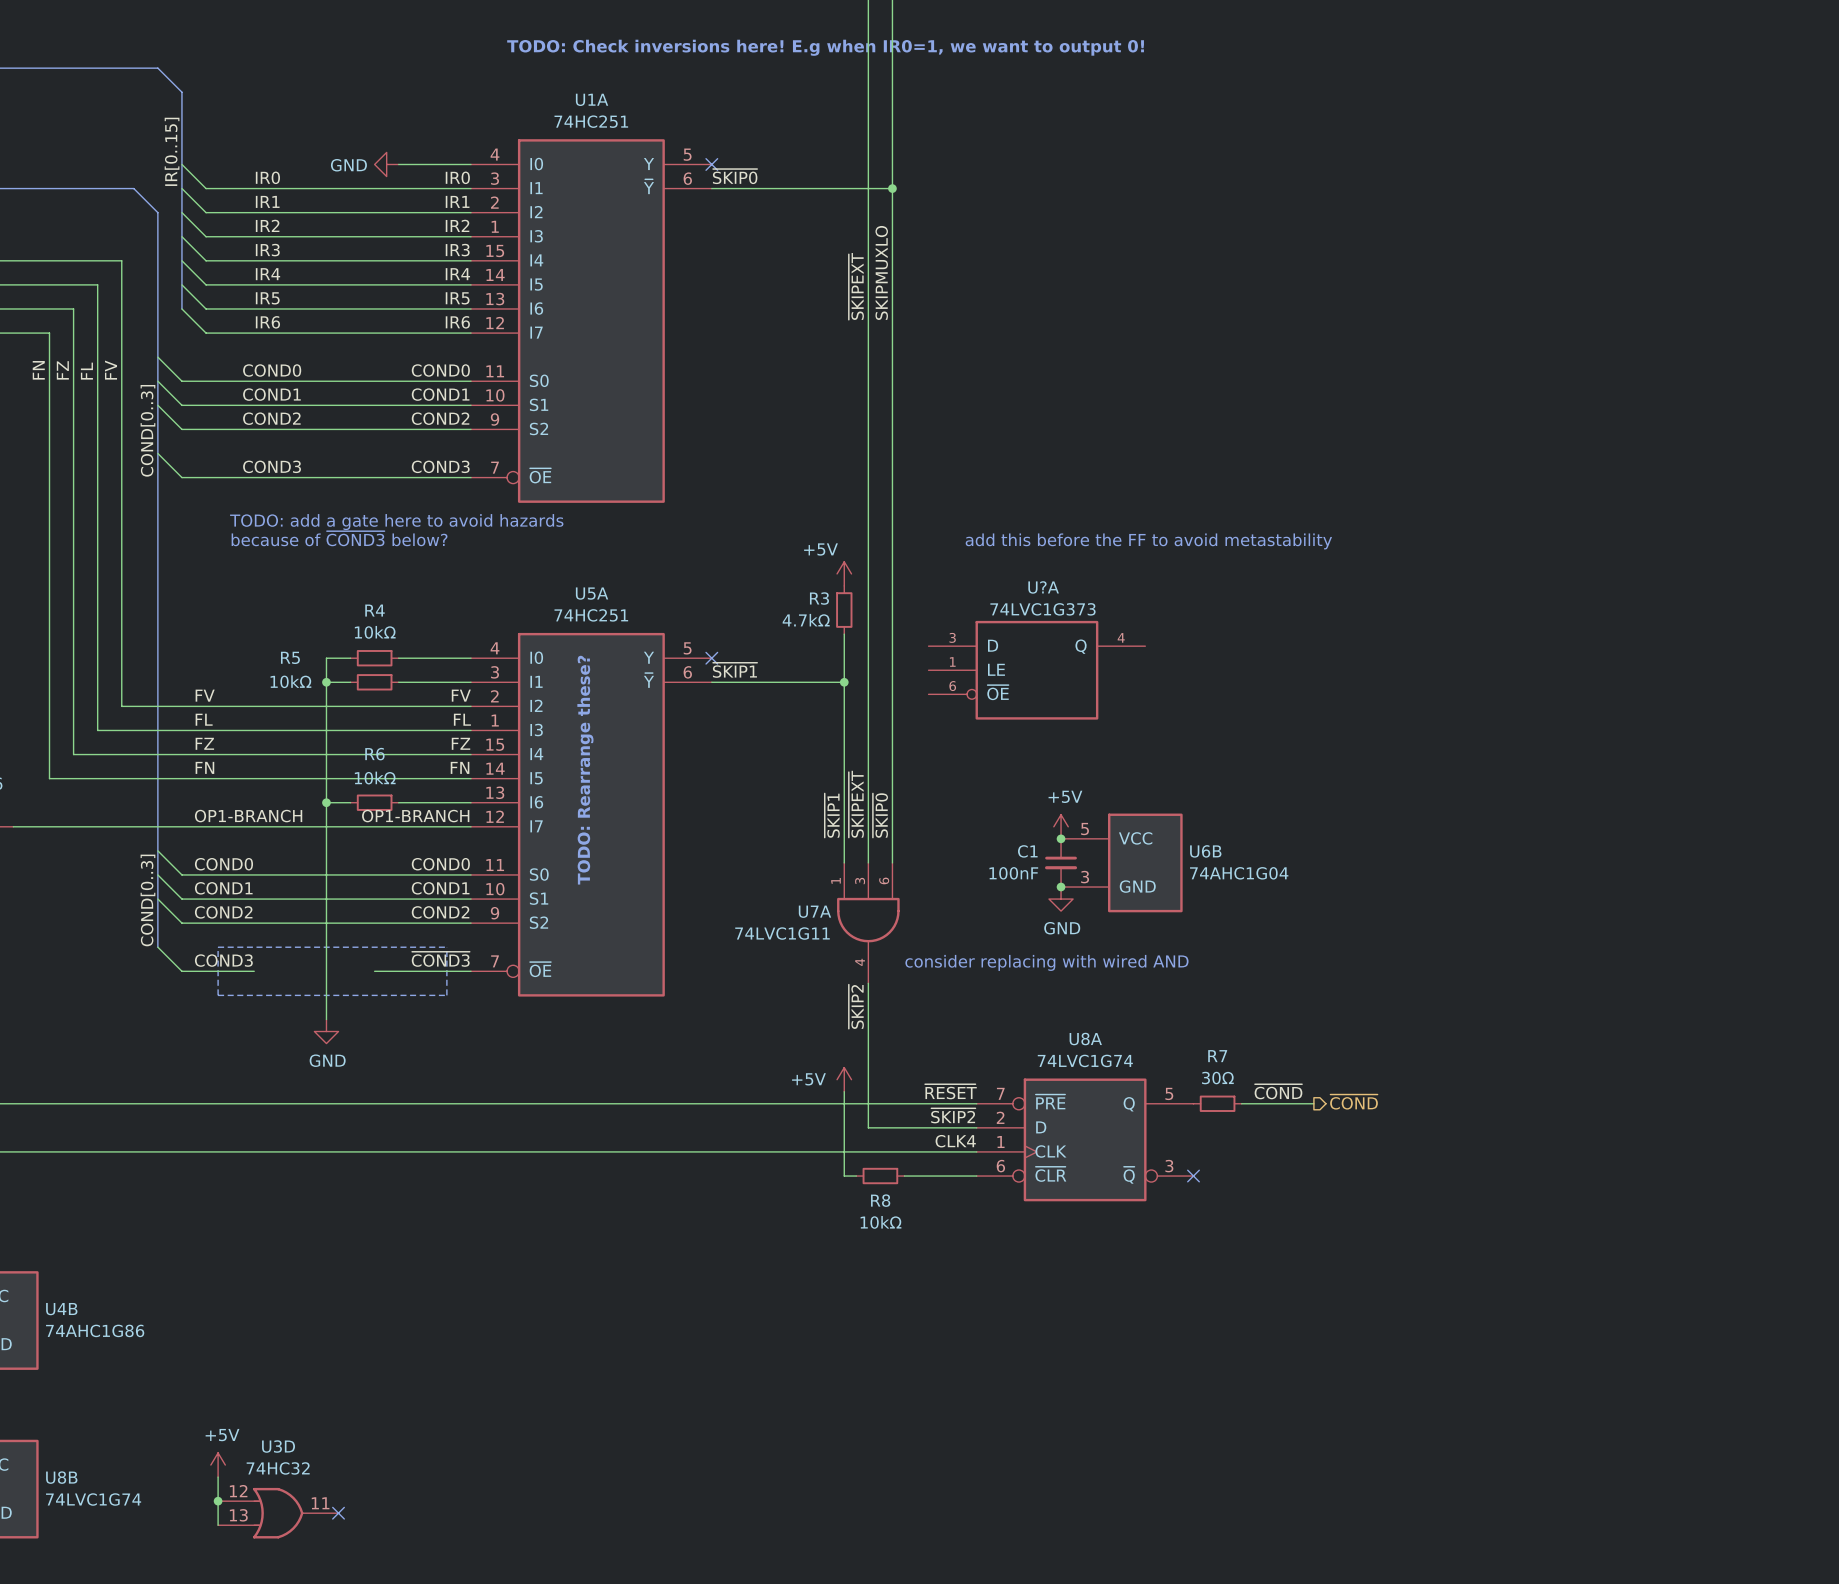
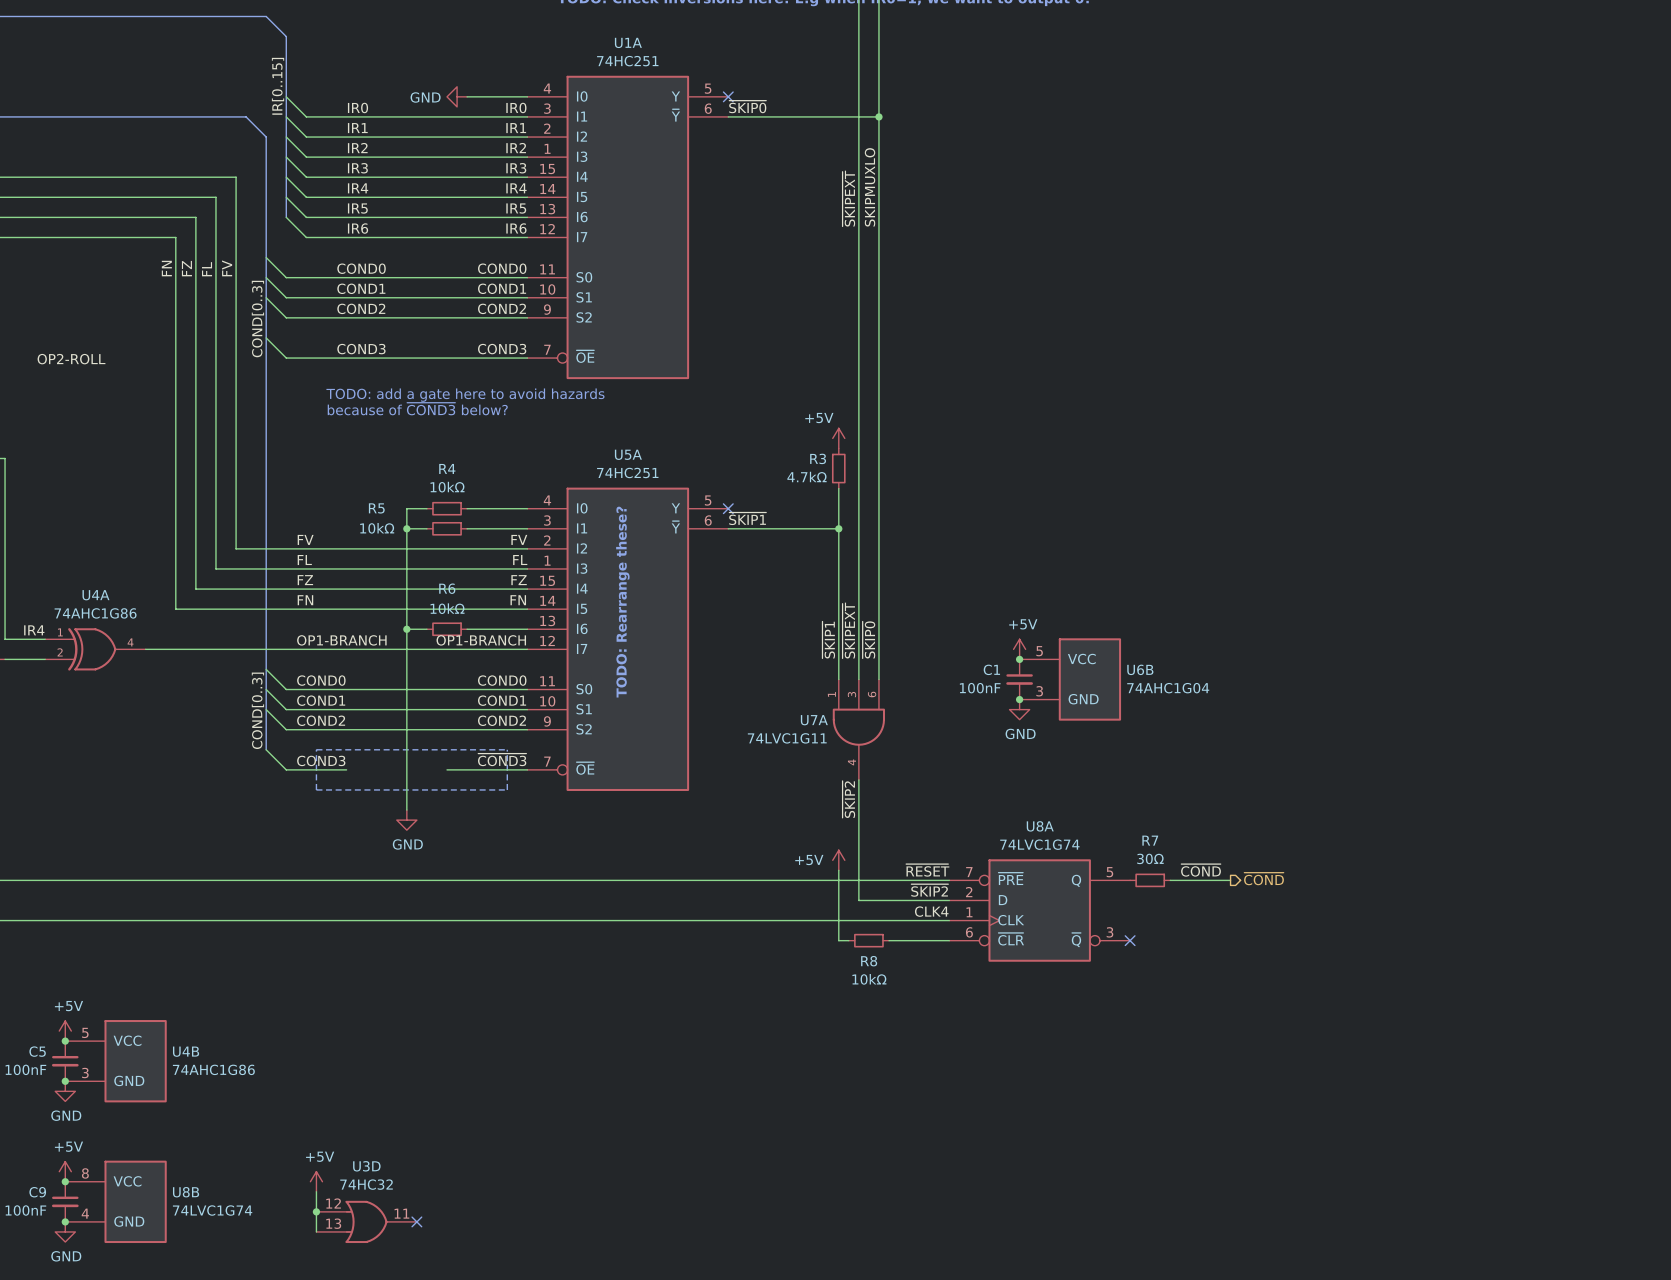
text: add this before the FF to avoid metastability (1148, 541) -> none
U?A: 74LVC1G373 (1036, 670) -> none
text: consider replacing with wired AND (1046, 962) -> none

